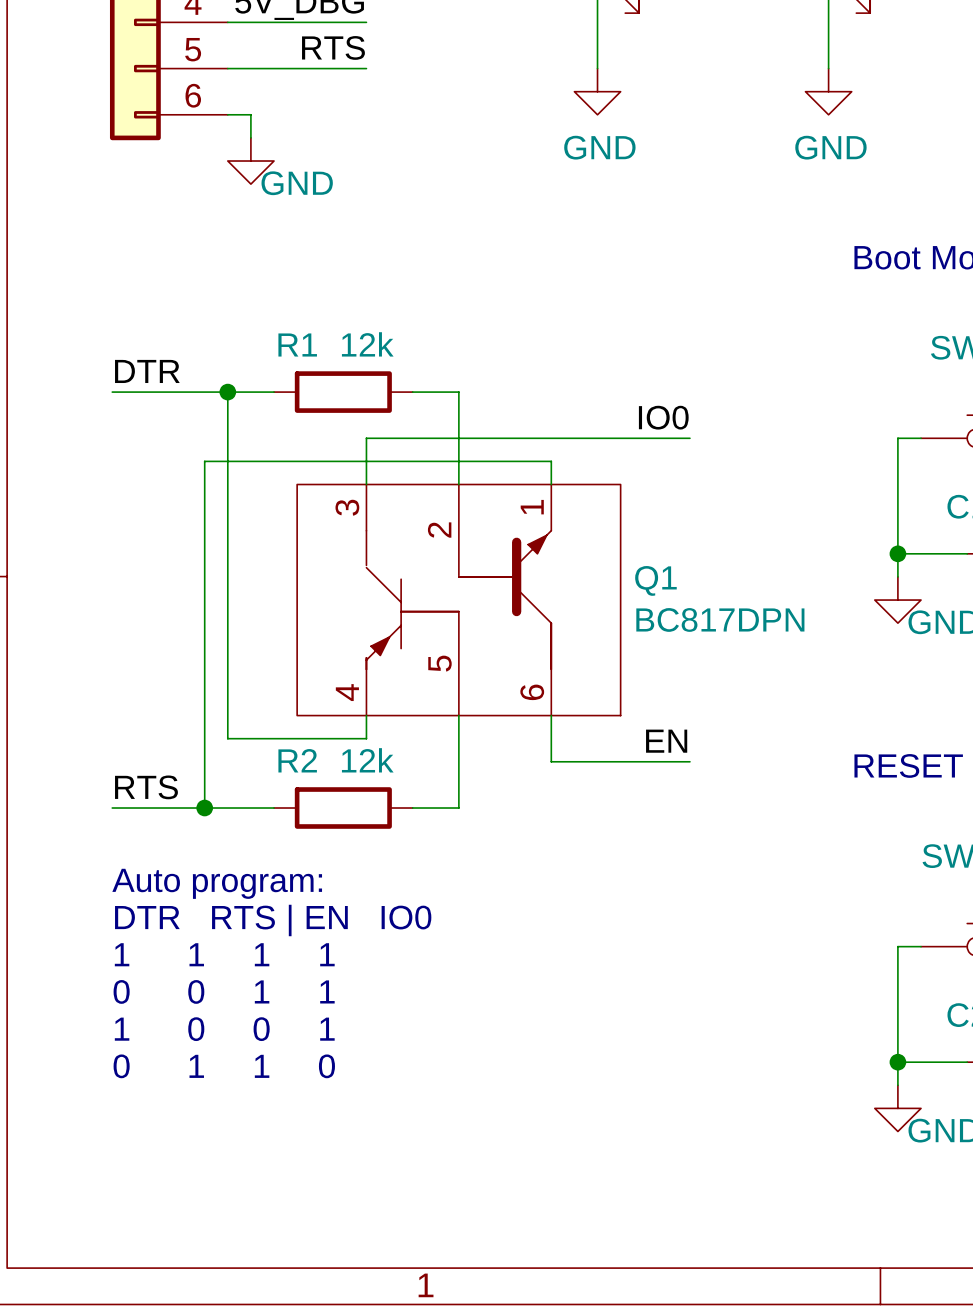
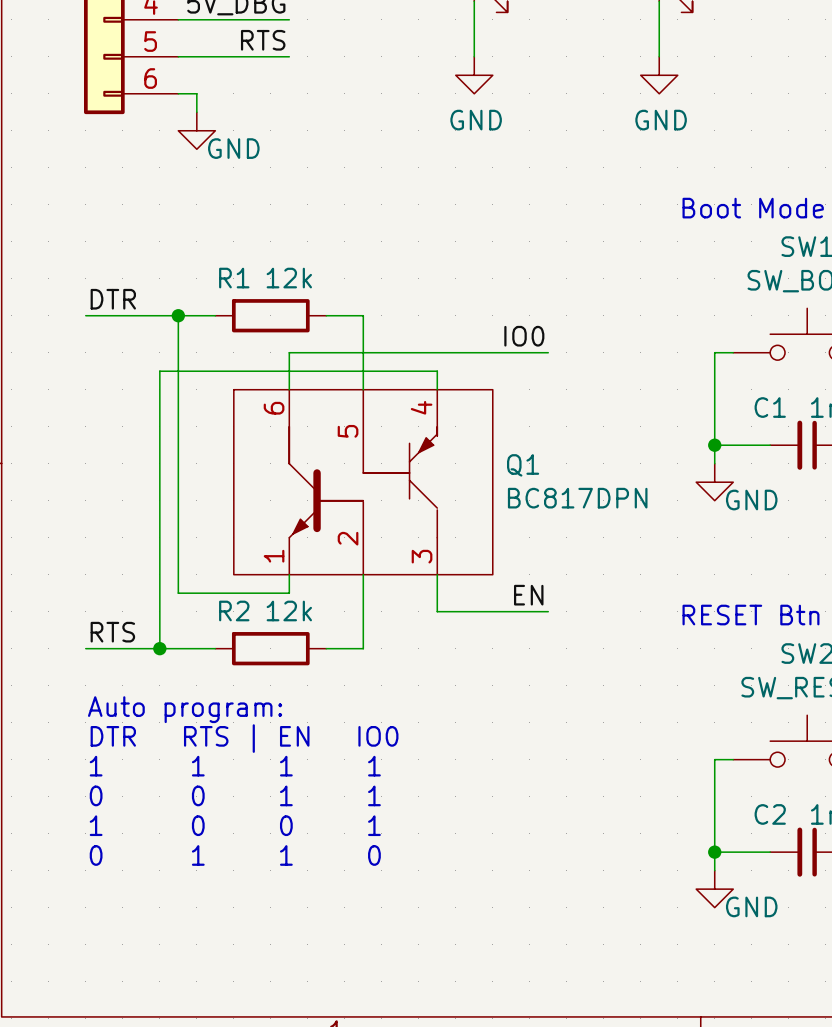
Q1 rotation: 0° (458, 600) -> 180° (363, 482)

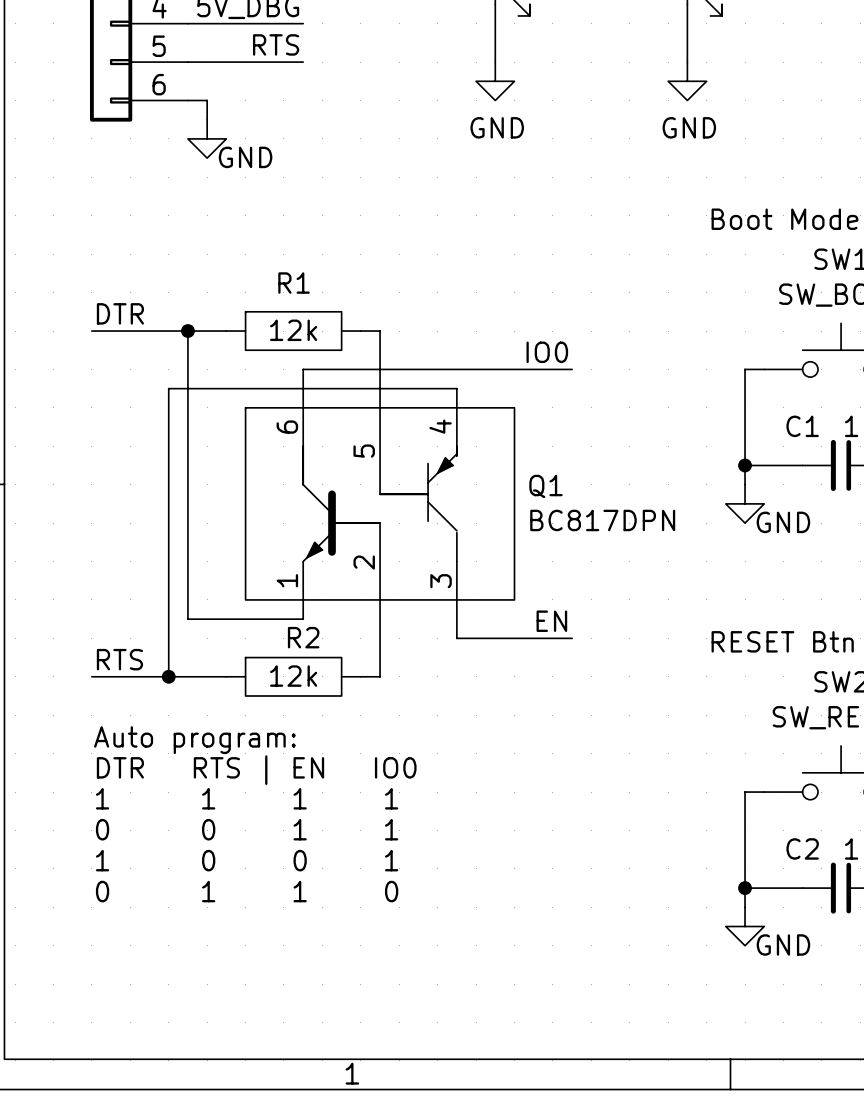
R1 name position: R1 (234, 278) -> R1 (294, 283)
R1 value: 12k (289, 278) -> none
R1 symbol: [215, 299, 327, 333] -> [226, 311, 361, 351]
R2 name position: R2 (234, 610) -> R2 (303, 637)
R2 value: 12k (289, 610) -> none
R2 symbol: [215, 632, 327, 666] -> [226, 657, 361, 696]

